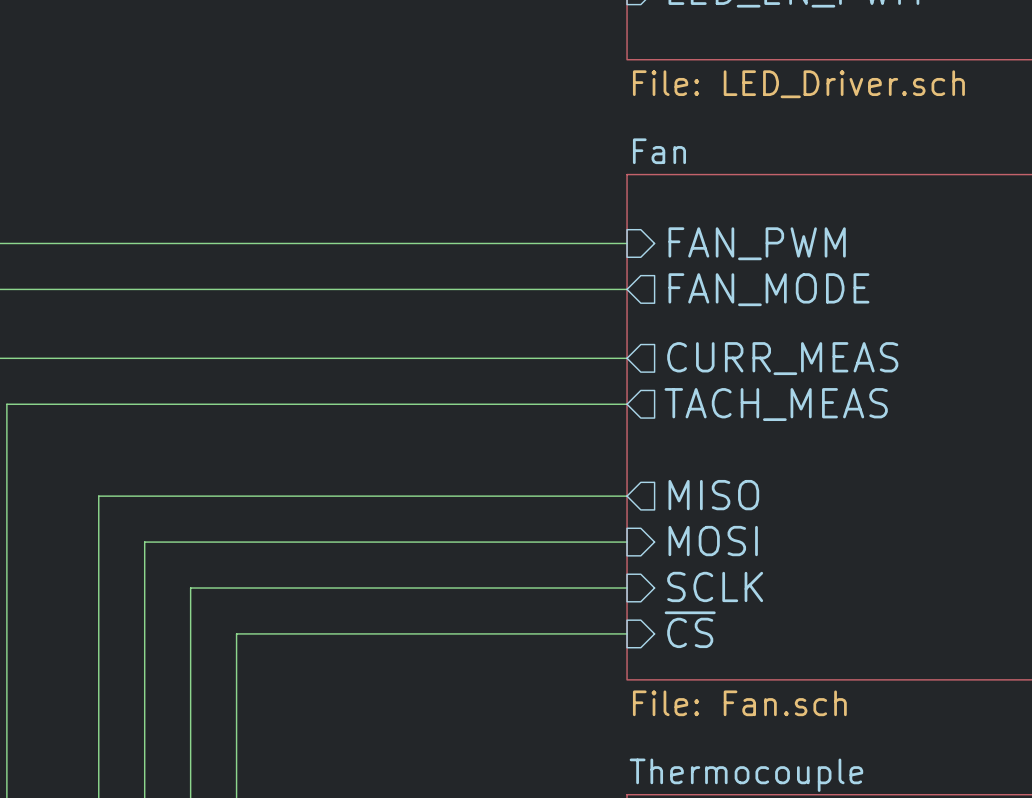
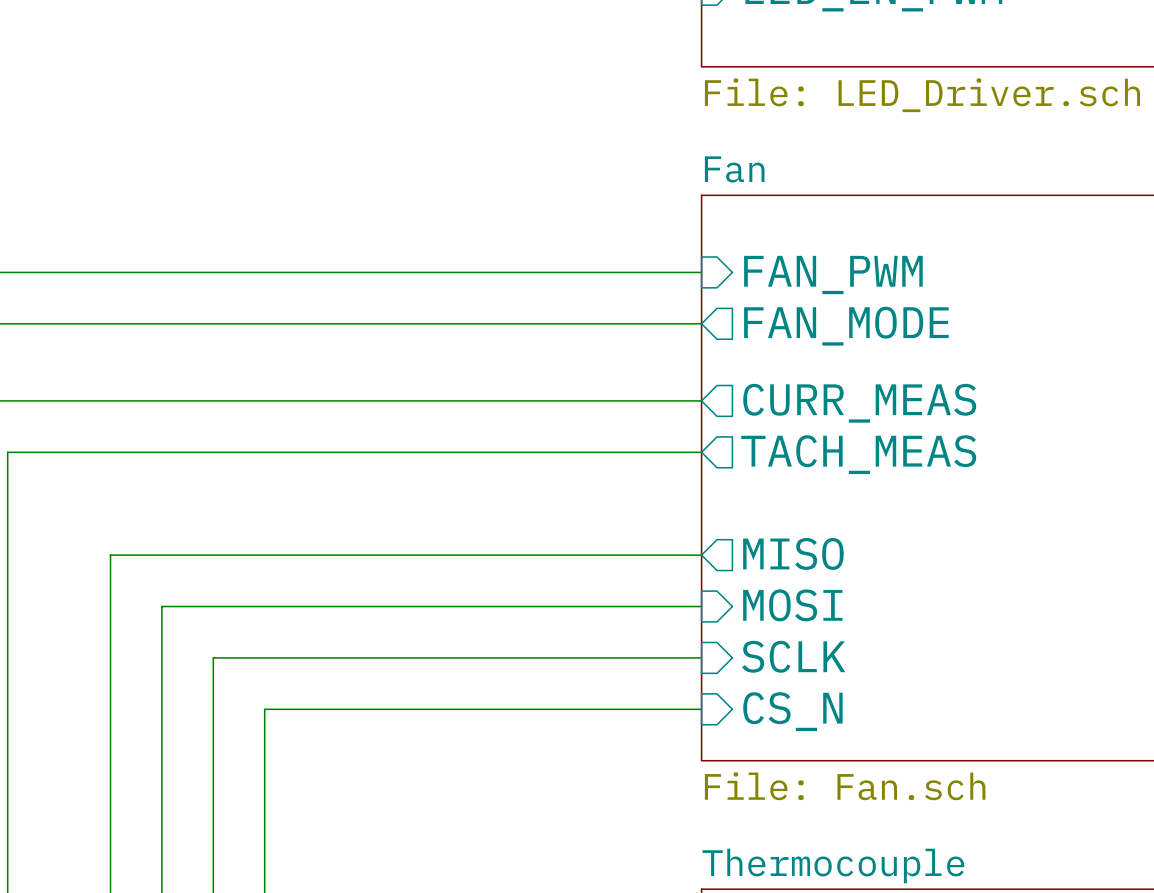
sheet pin: ~{CS} (690, 629) -> CS_N (792, 711)

